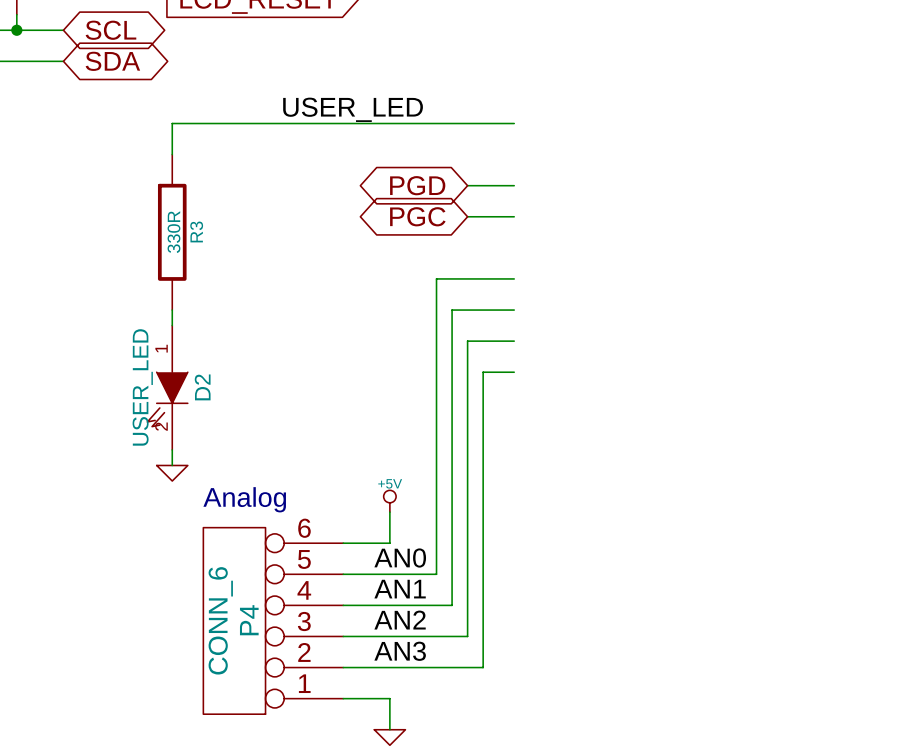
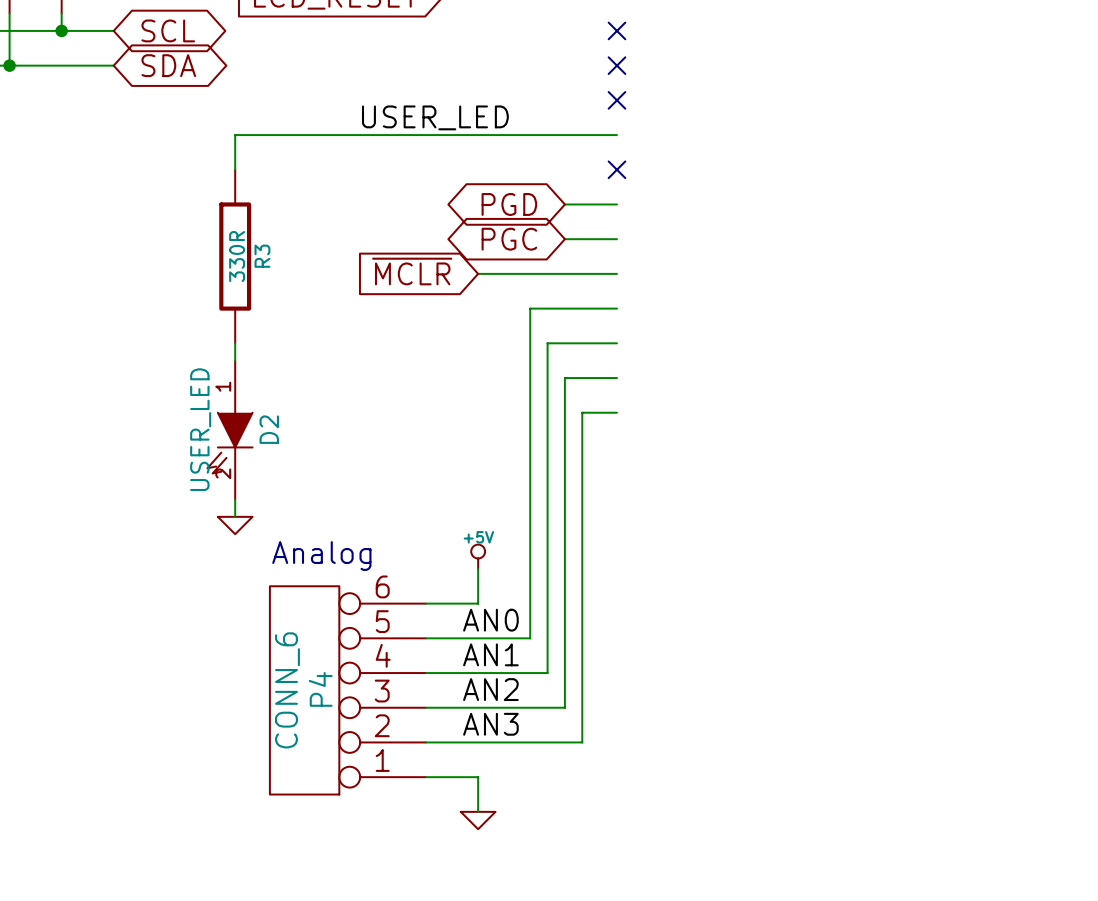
no-connect mark: none -> (616, 30)
no-connect mark: none -> (616, 65)
no-connect mark: none -> (616, 100)
no-connect mark: none -> (616, 169)
global label: none -> ~{MCLR} (412, 271)
wire: none -> (478, 273) (616, 273)

